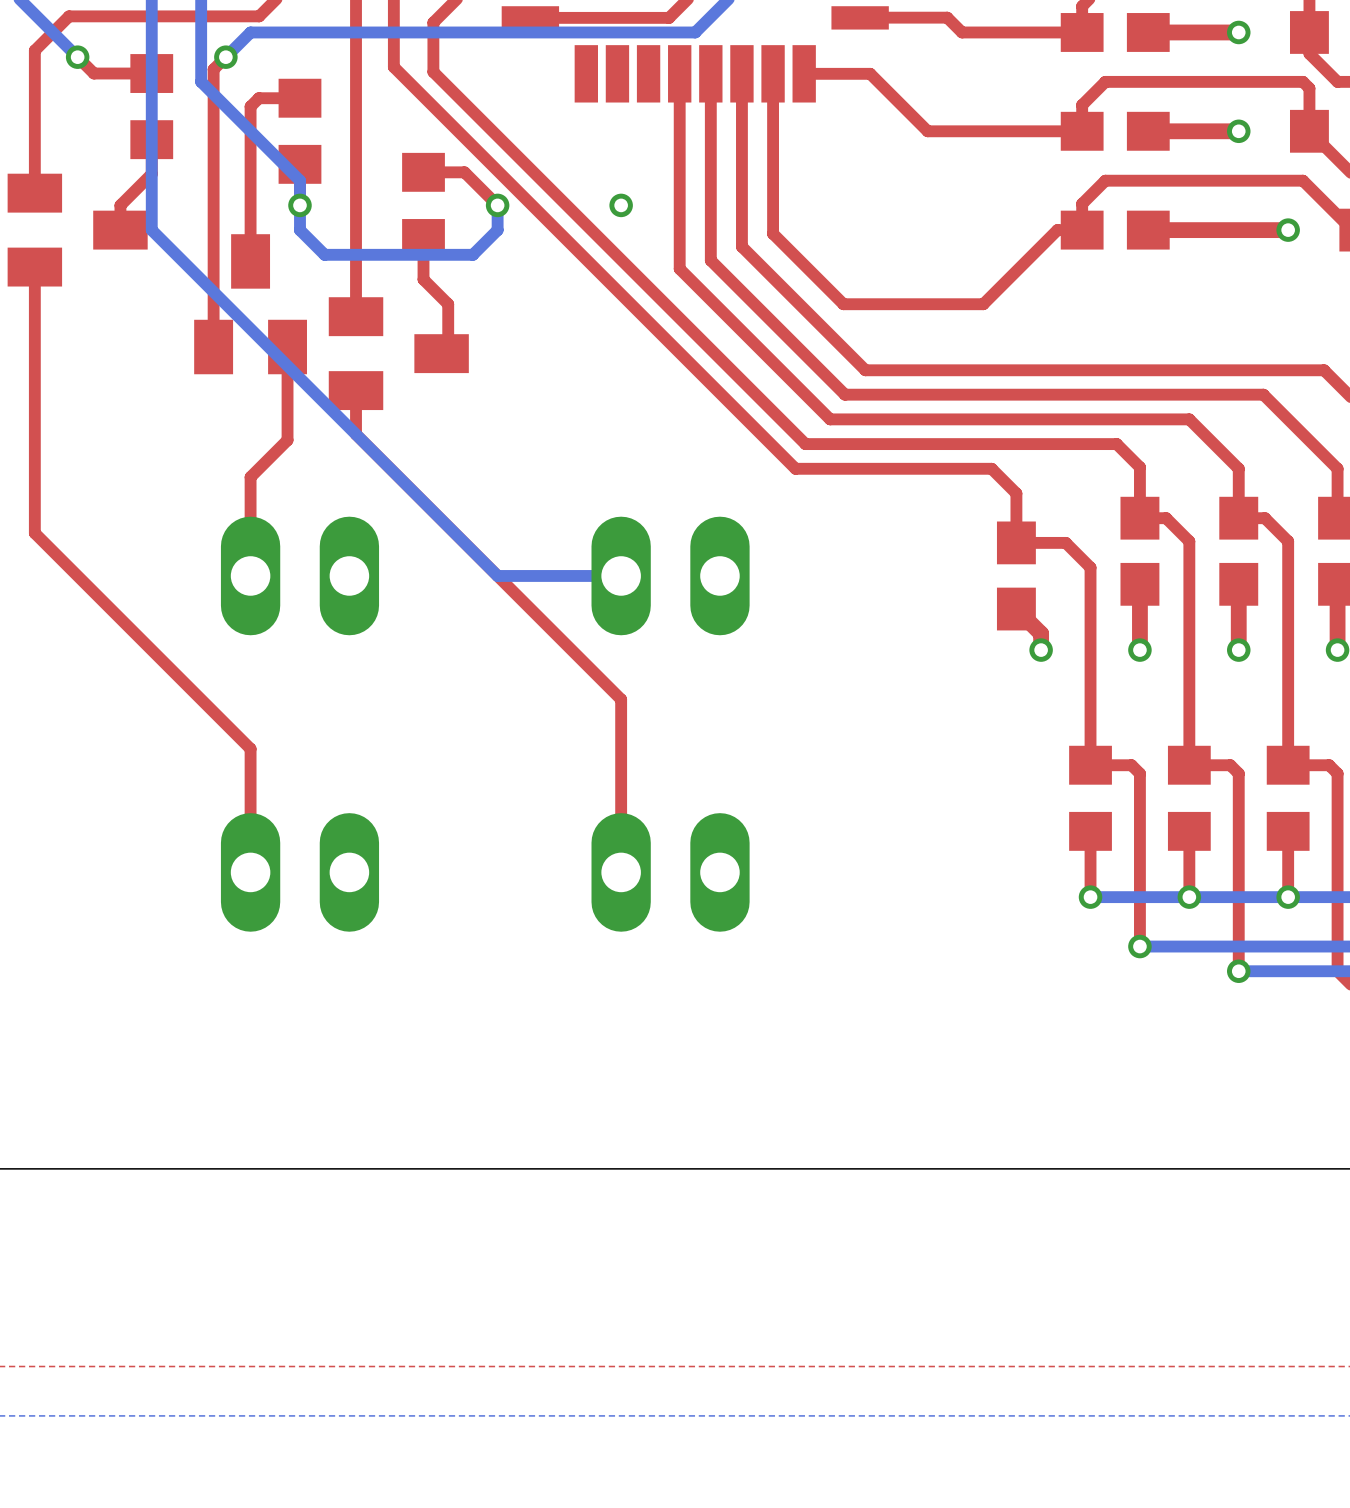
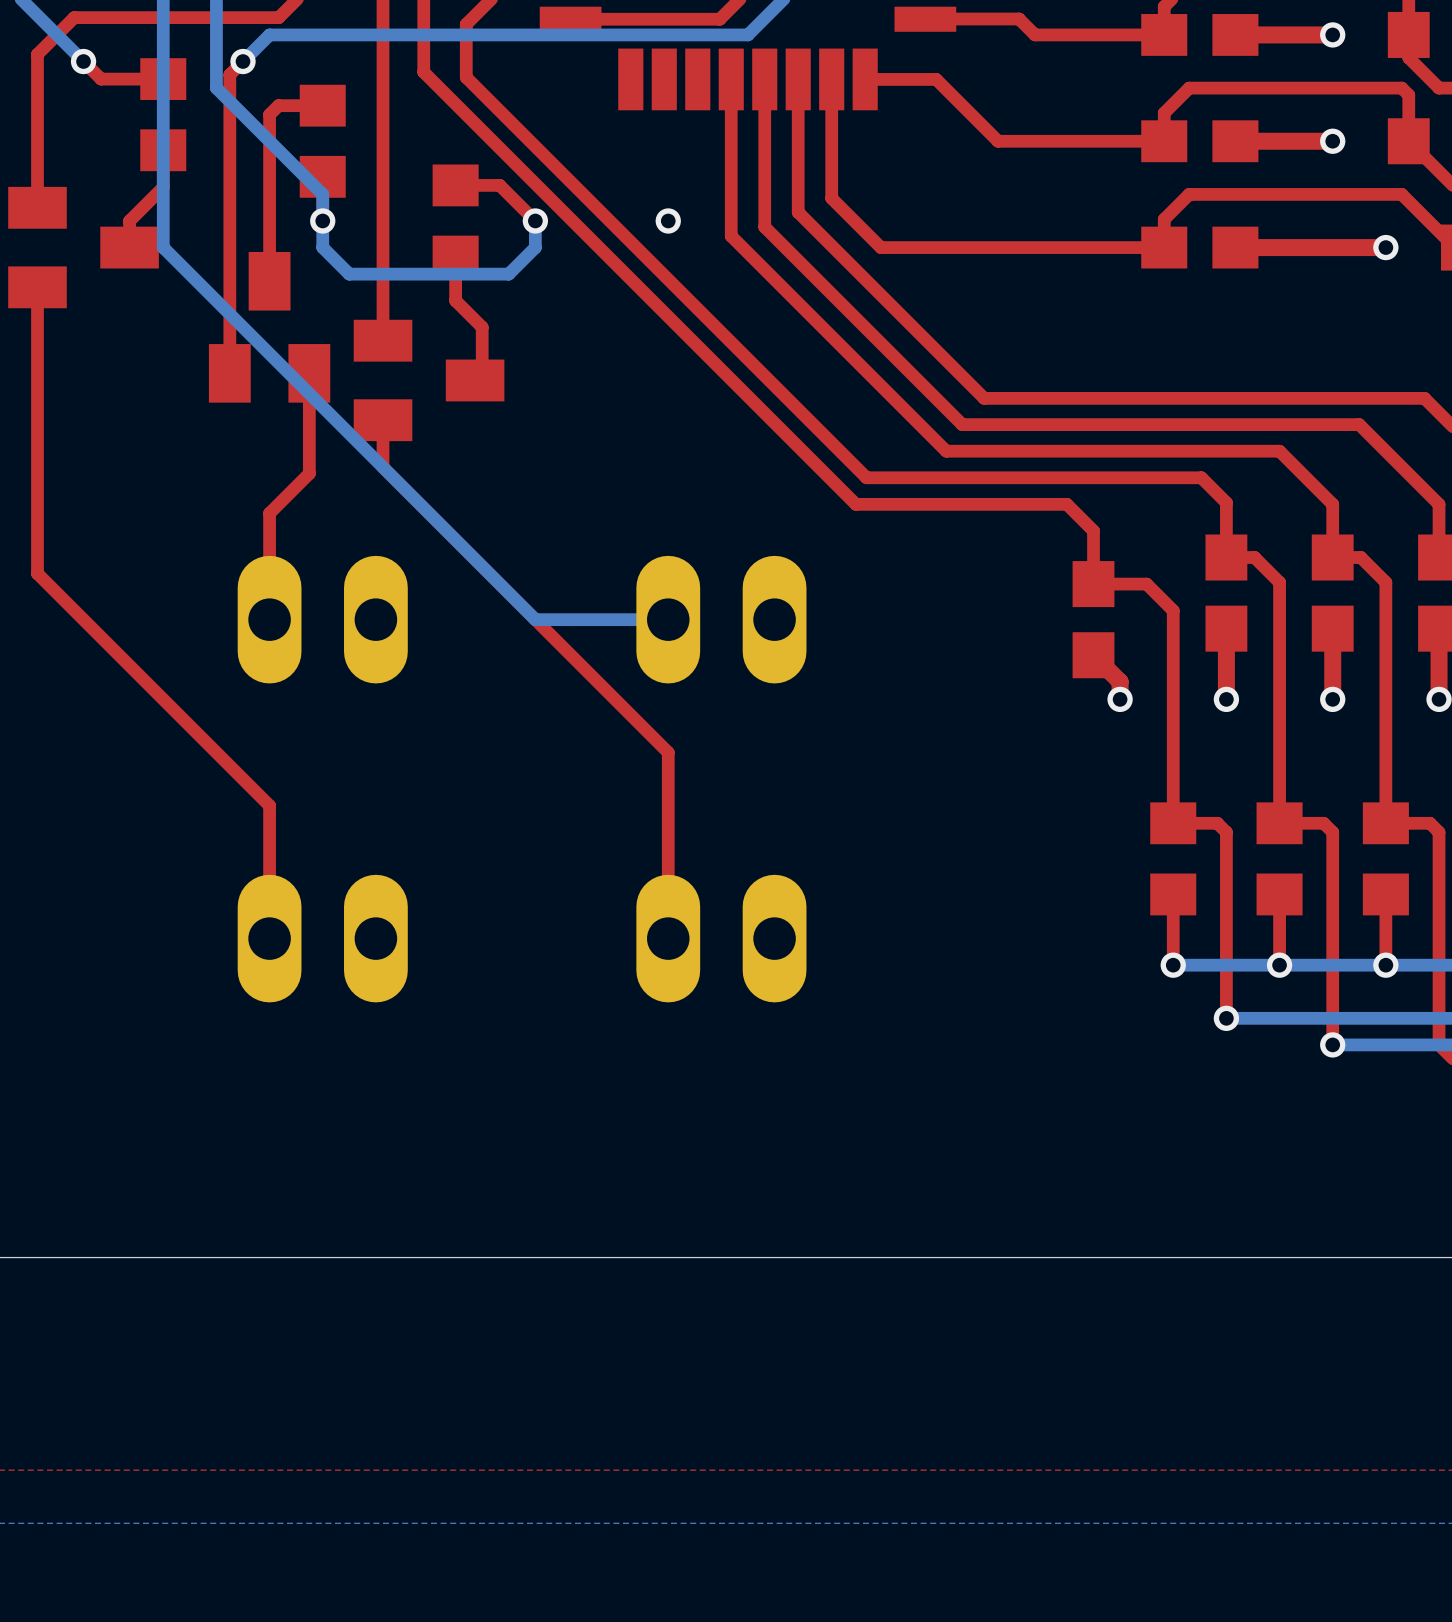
top track: (773, 184) (773, 233) (843, 304) (983, 304) (1057, 230) -> (831, 198) (880, 247) (1137, 247)
top track: (741, 197) (741, 246) (865, 370) (914, 370) -> (798, 212) (984, 398)
top track: (710, 211) (710, 260) (845, 394) (894, 394) -> (764, 227) (962, 424)
top track: (679, 219) (679, 268) (830, 419) (879, 419) -> (731, 236) (946, 451)

